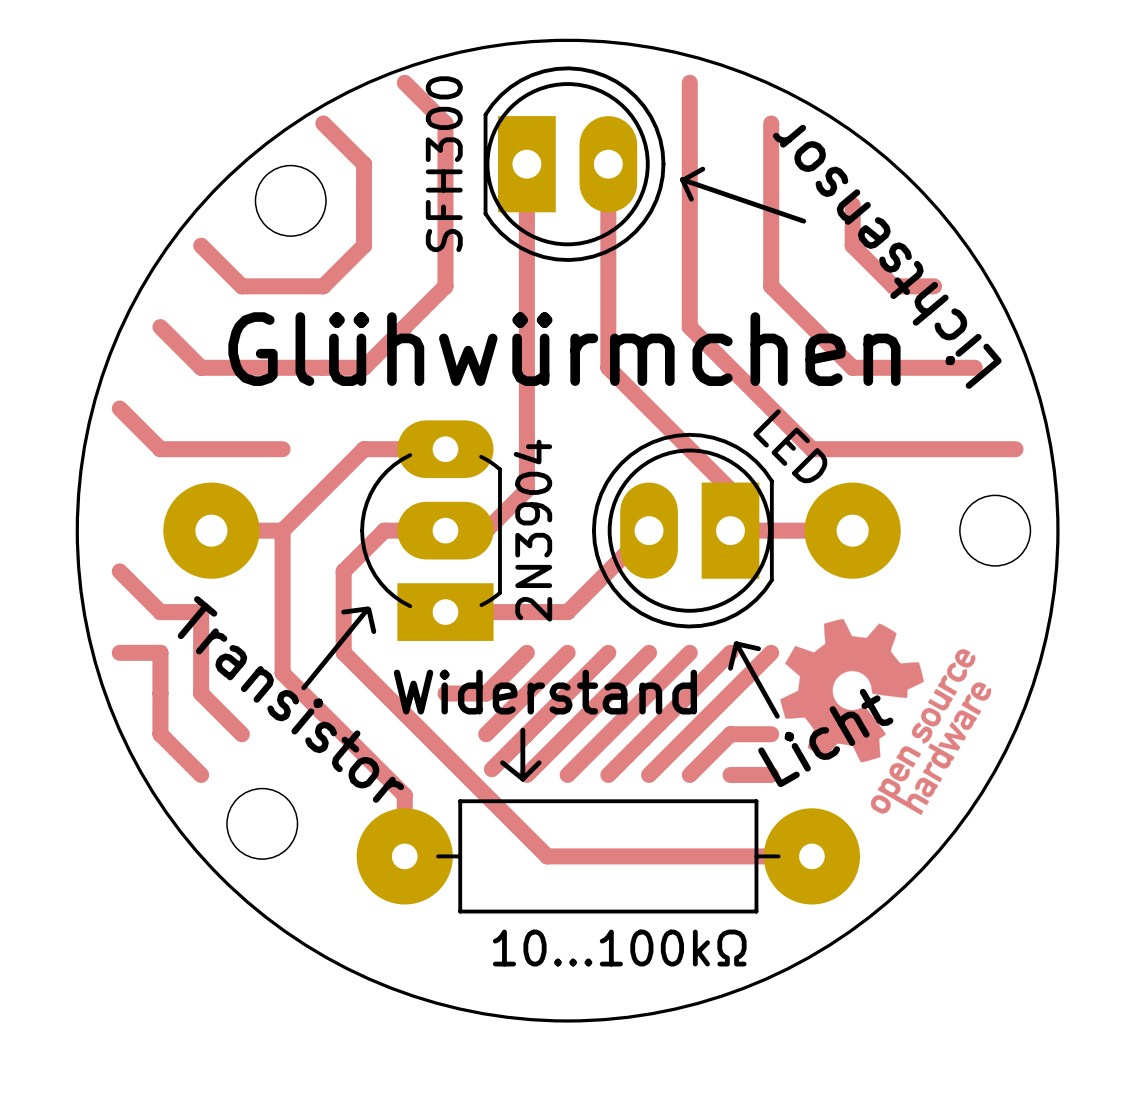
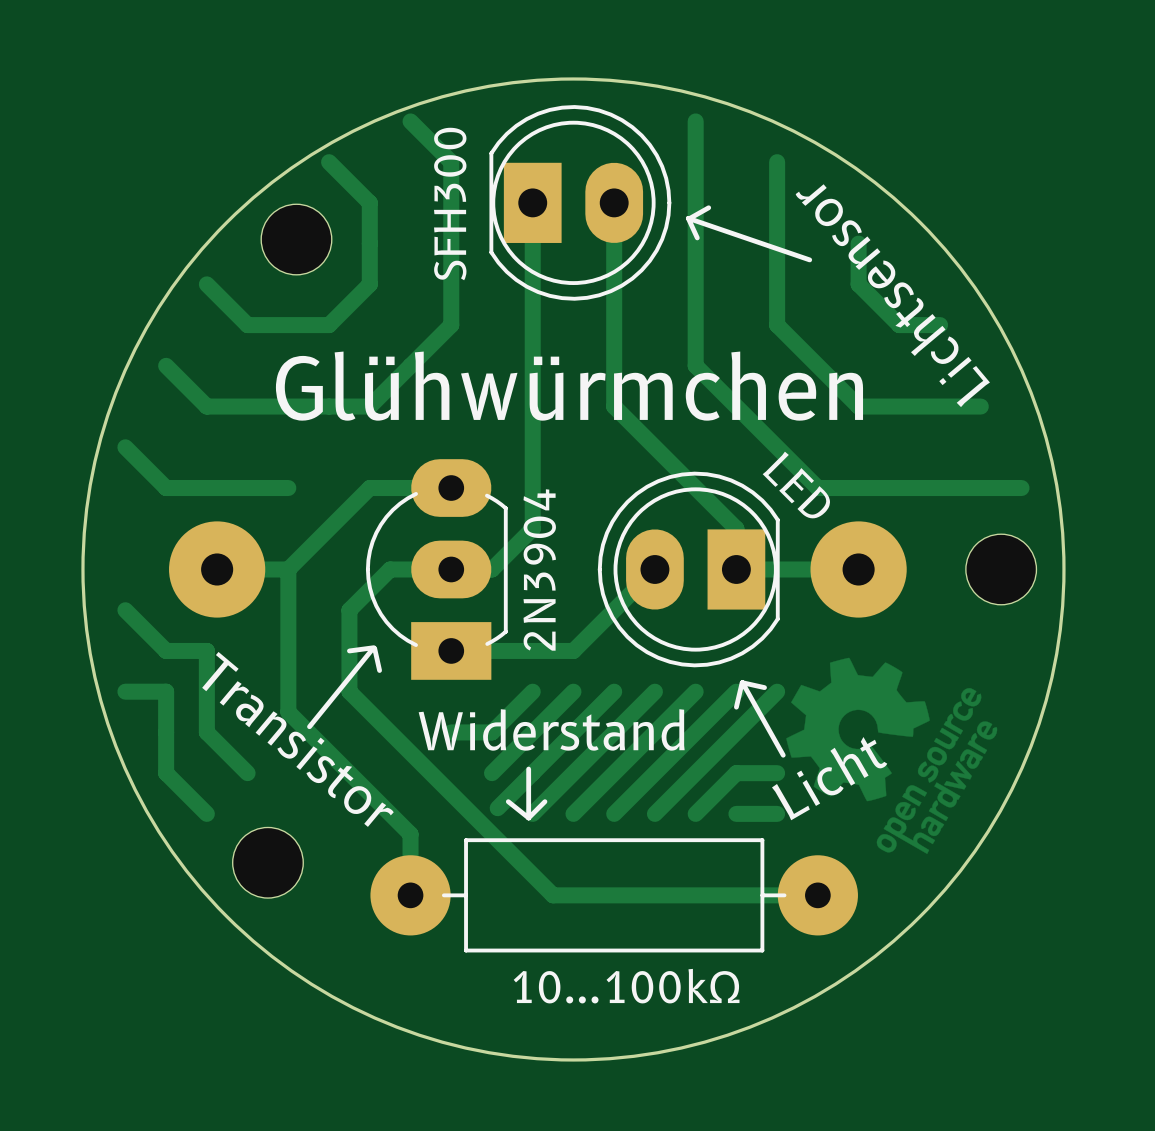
part footprint: [483, 66, 666, 262] -> [489, 105, 672, 301]
part footprint: [360, 420, 502, 641] -> [365, 459, 508, 680]
part footprint: [591, 432, 774, 629] -> [597, 471, 780, 668]
part footprint: [356, 799, 861, 914] -> [370, 838, 858, 953]

